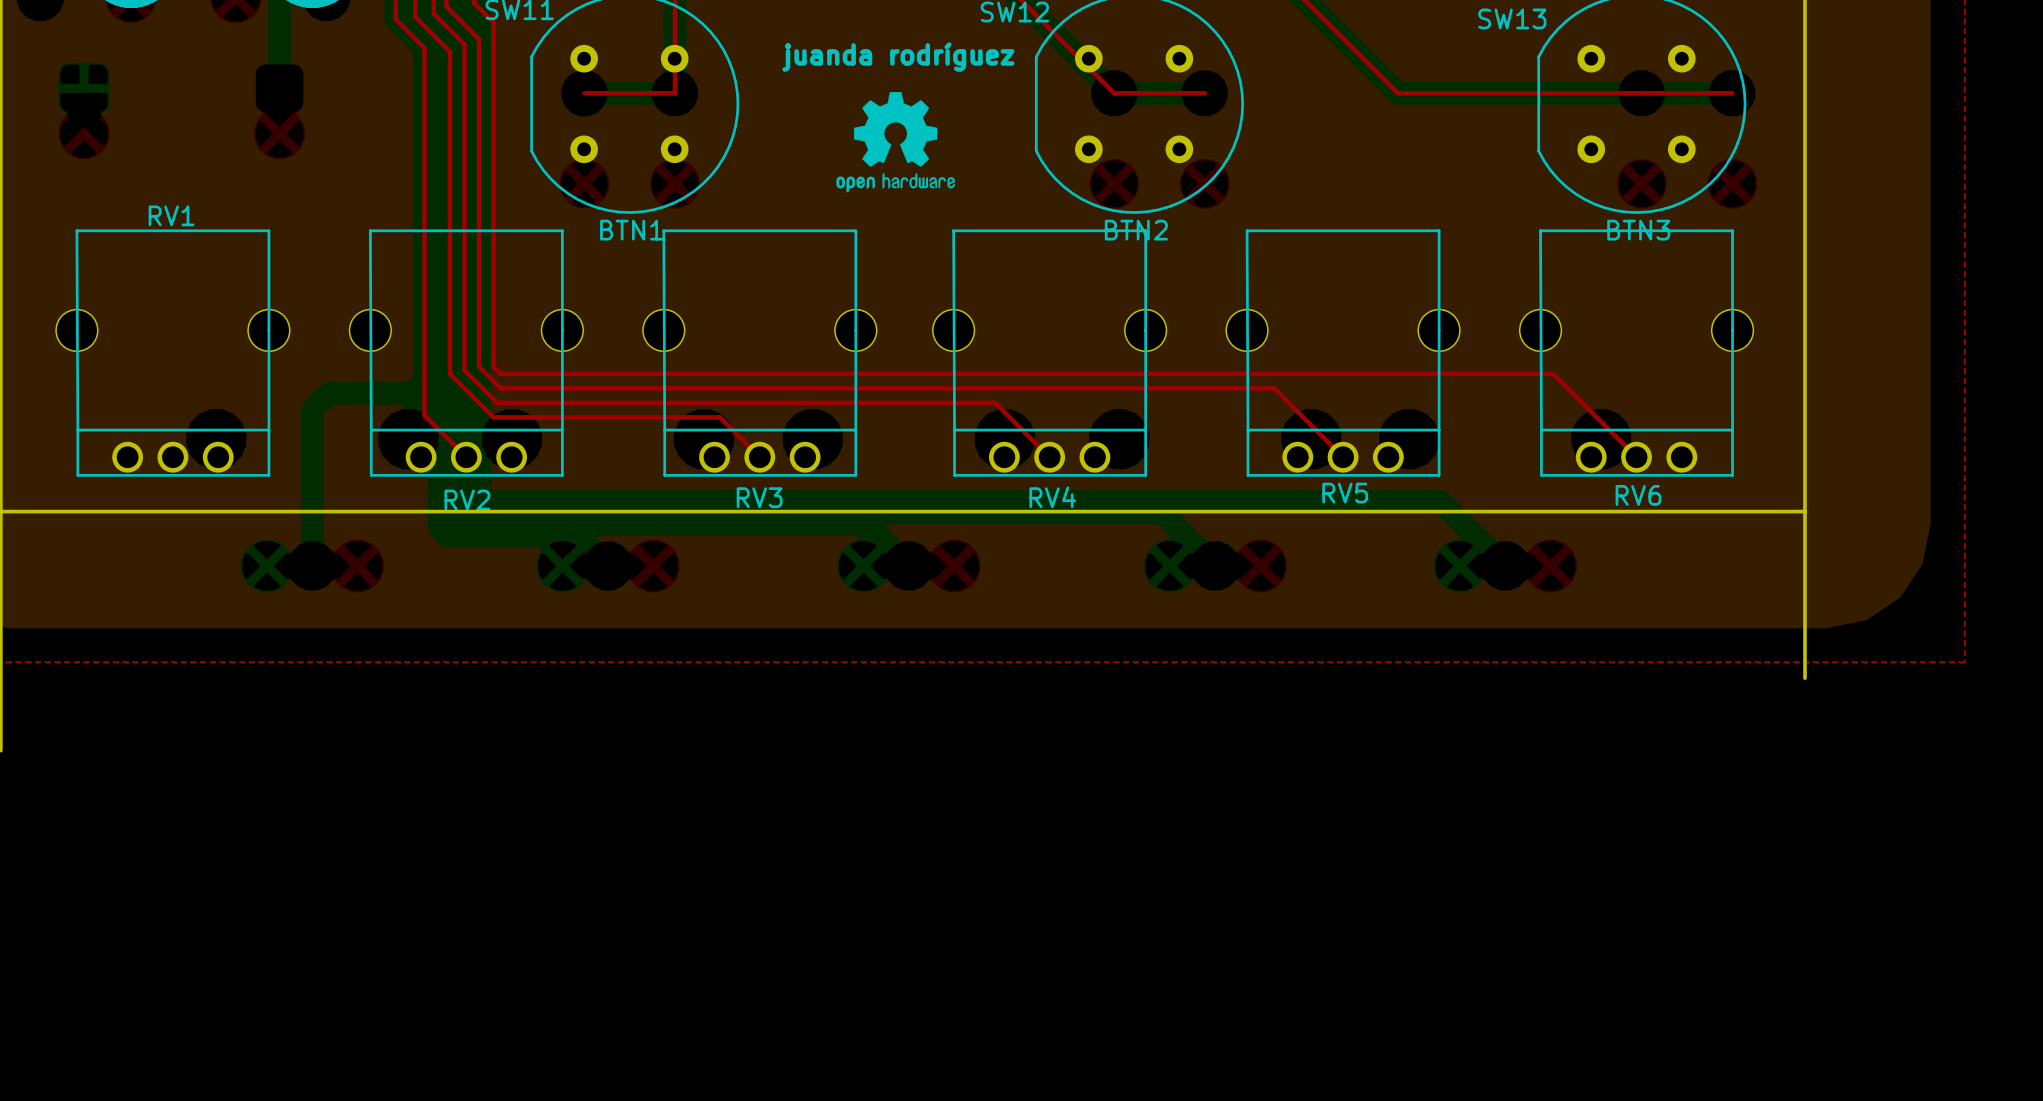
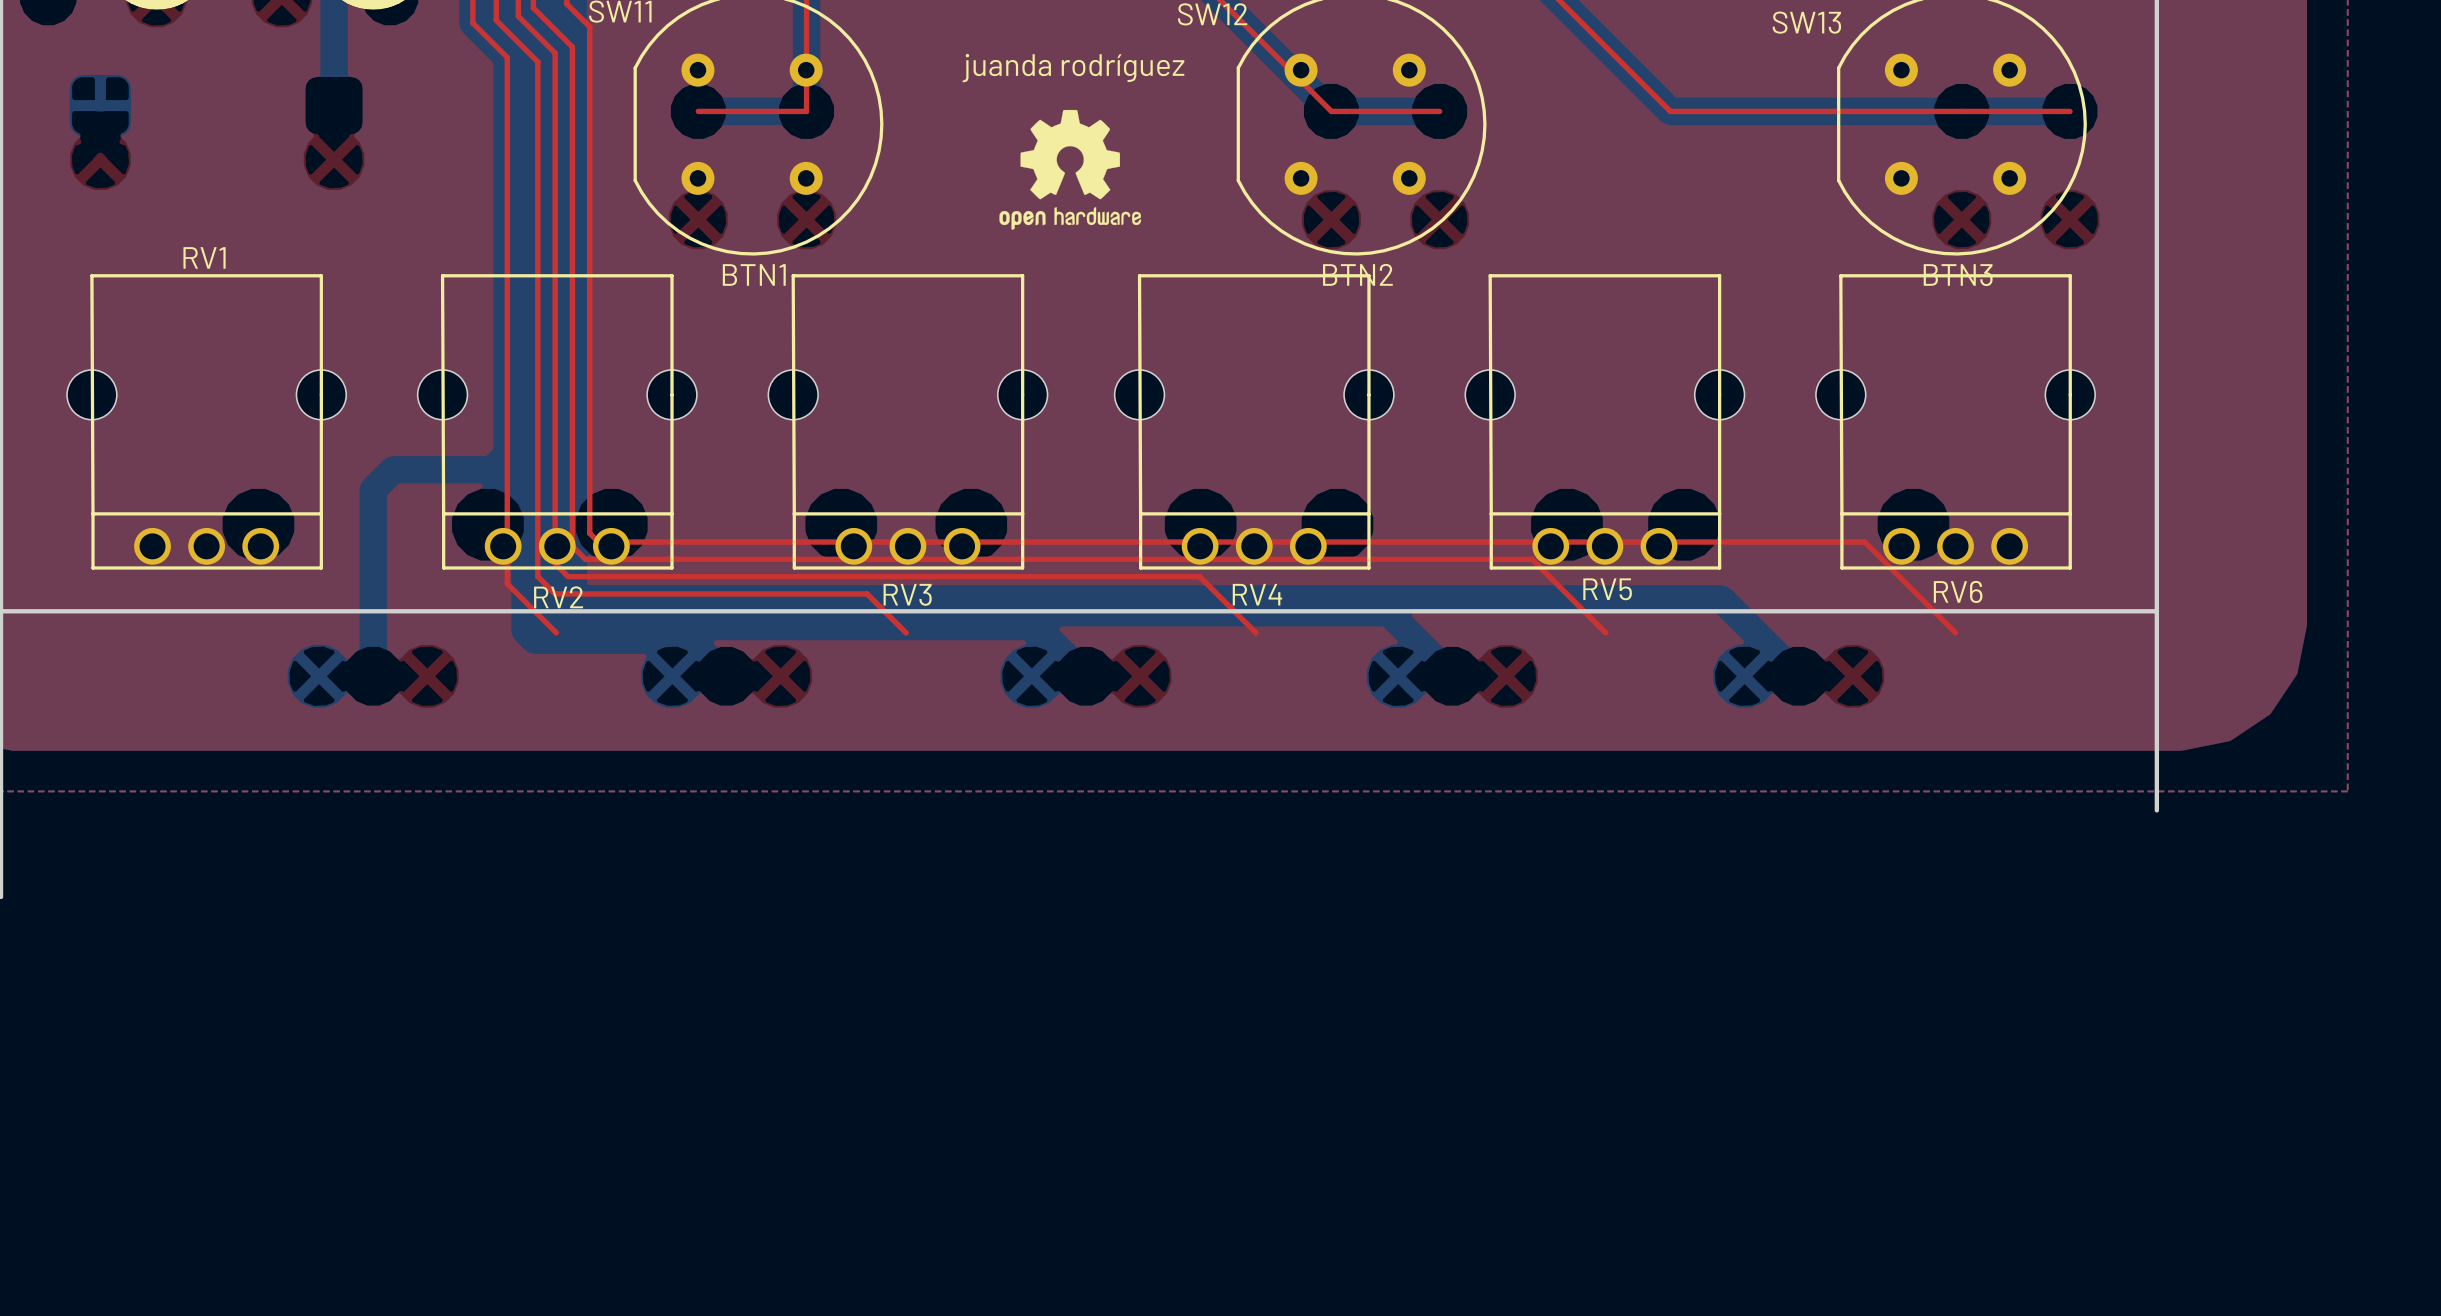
top track: (479, 366) (500, 388) (1274, 388) (1343, 457) -> (572, 438) (572, 546) (585, 559) (1532, 559) (1605, 632)
top track: (493, 366) (500, 373) (1553, 373) (1636, 457) -> (589, 438) (589, 533) (598, 542) (1864, 542) (1955, 632)
top track: (464, 370) (497, 402) (995, 402) (1049, 457) -> (555, 442) (555, 563) (568, 576) (1199, 576) (1255, 632)
top track: (450, 373) (493, 417) (719, 417) (759, 457) -> (537, 446) (537, 576) (555, 593) (867, 593) (906, 633)
top track: (424, 415) (466, 457) -> (507, 496) (507, 583) (556, 632)

